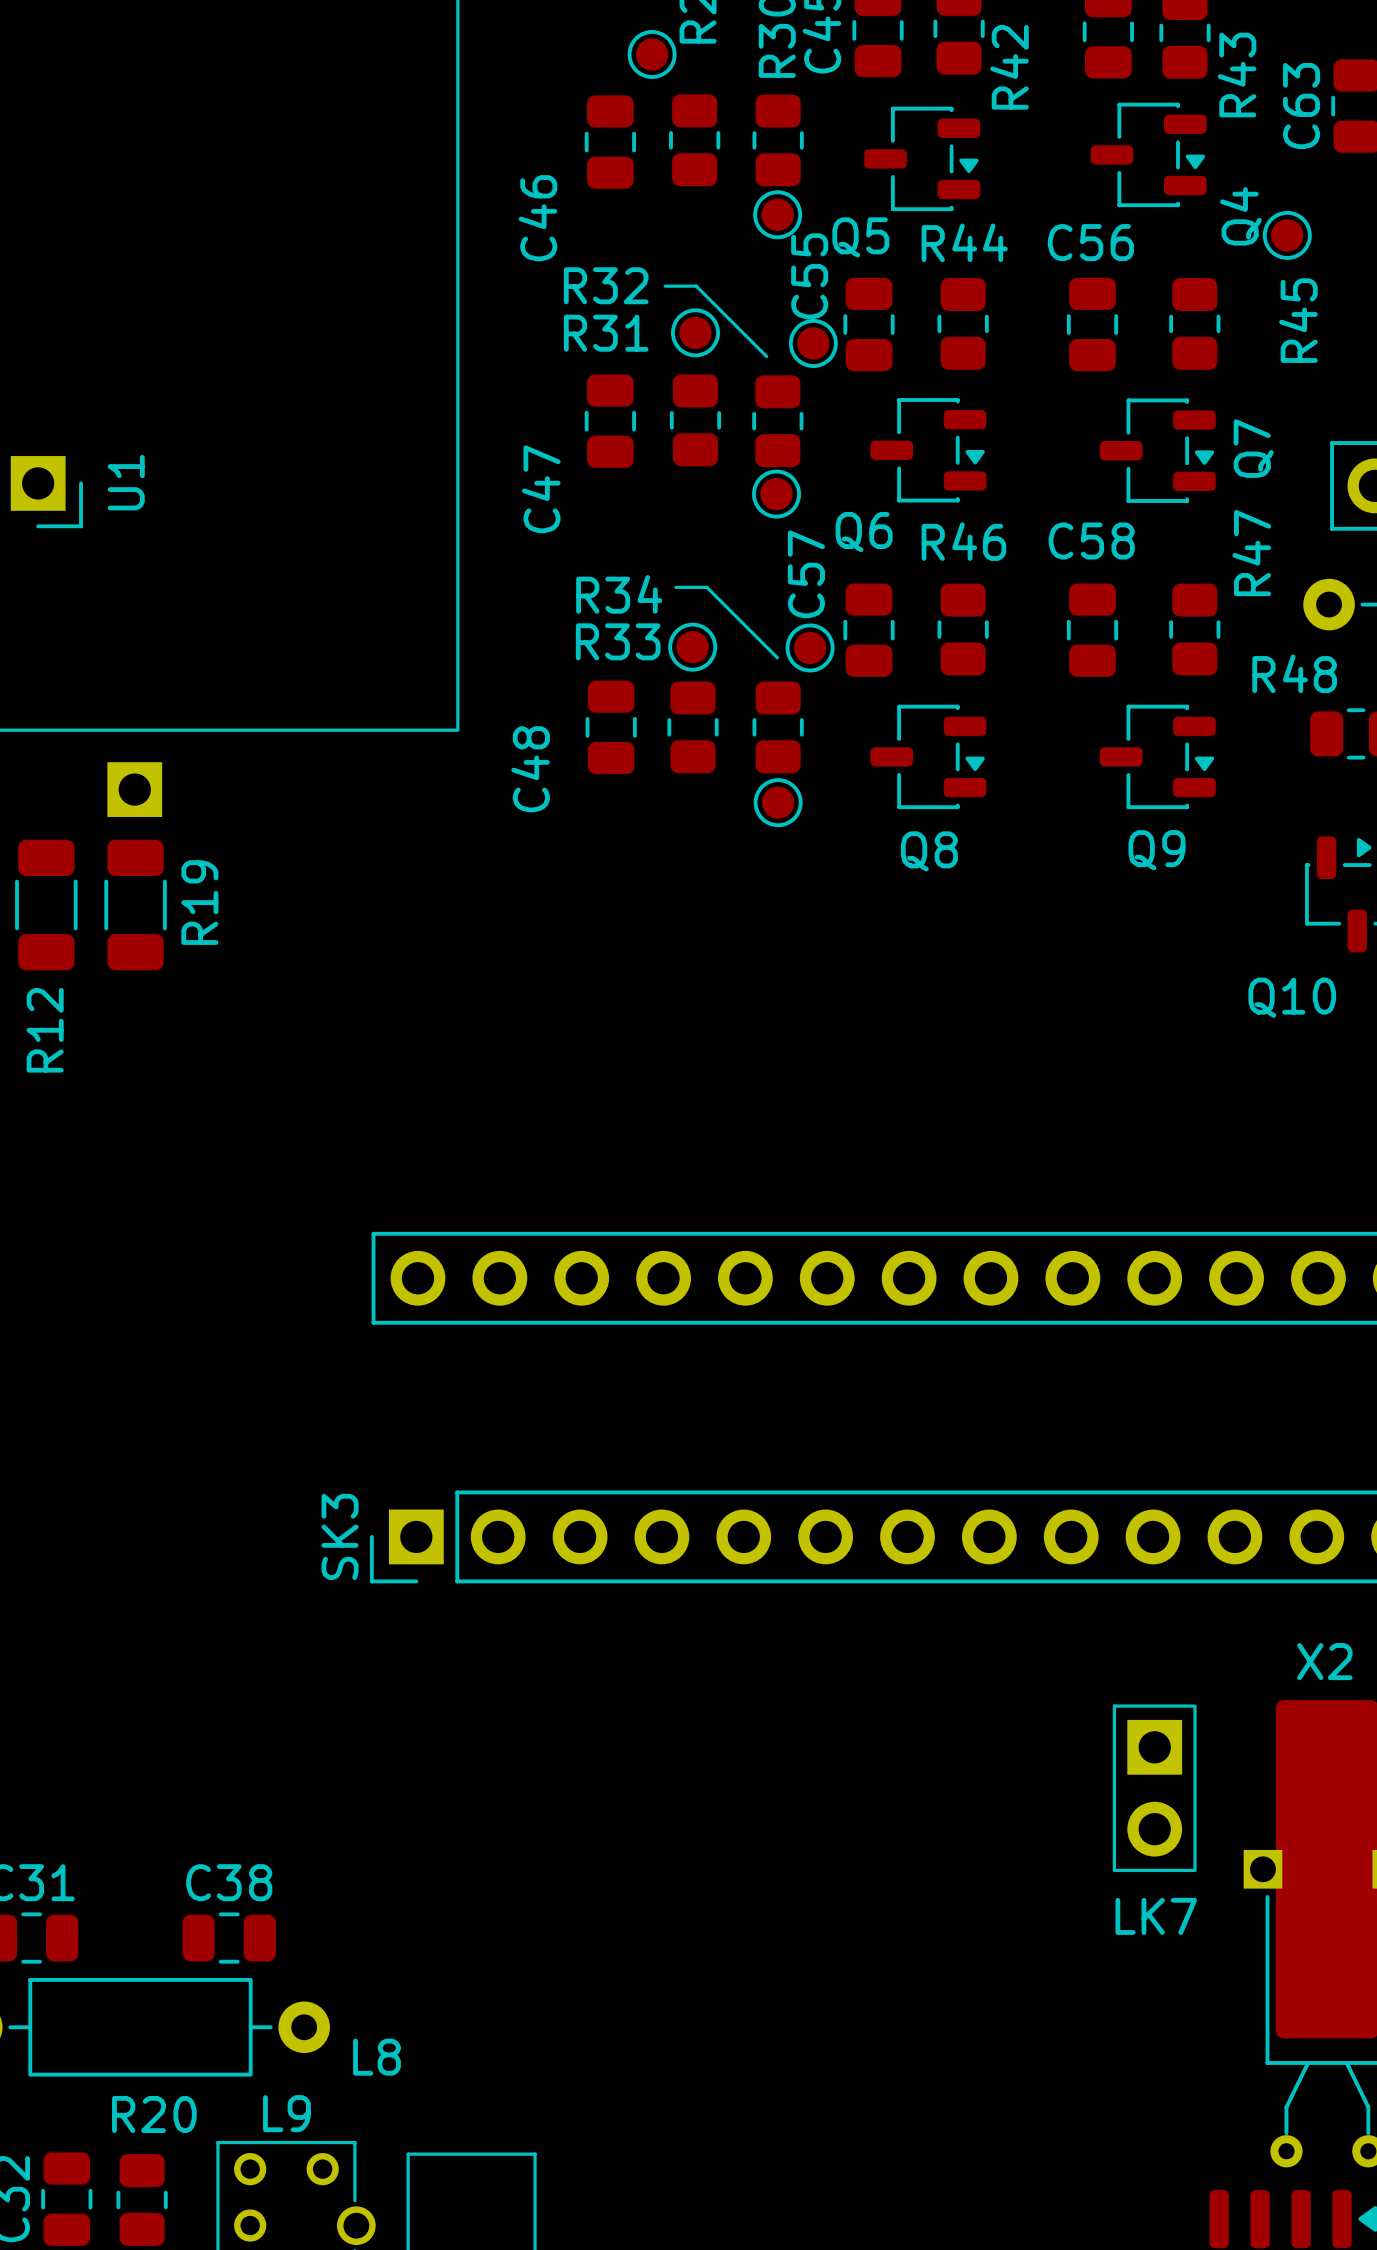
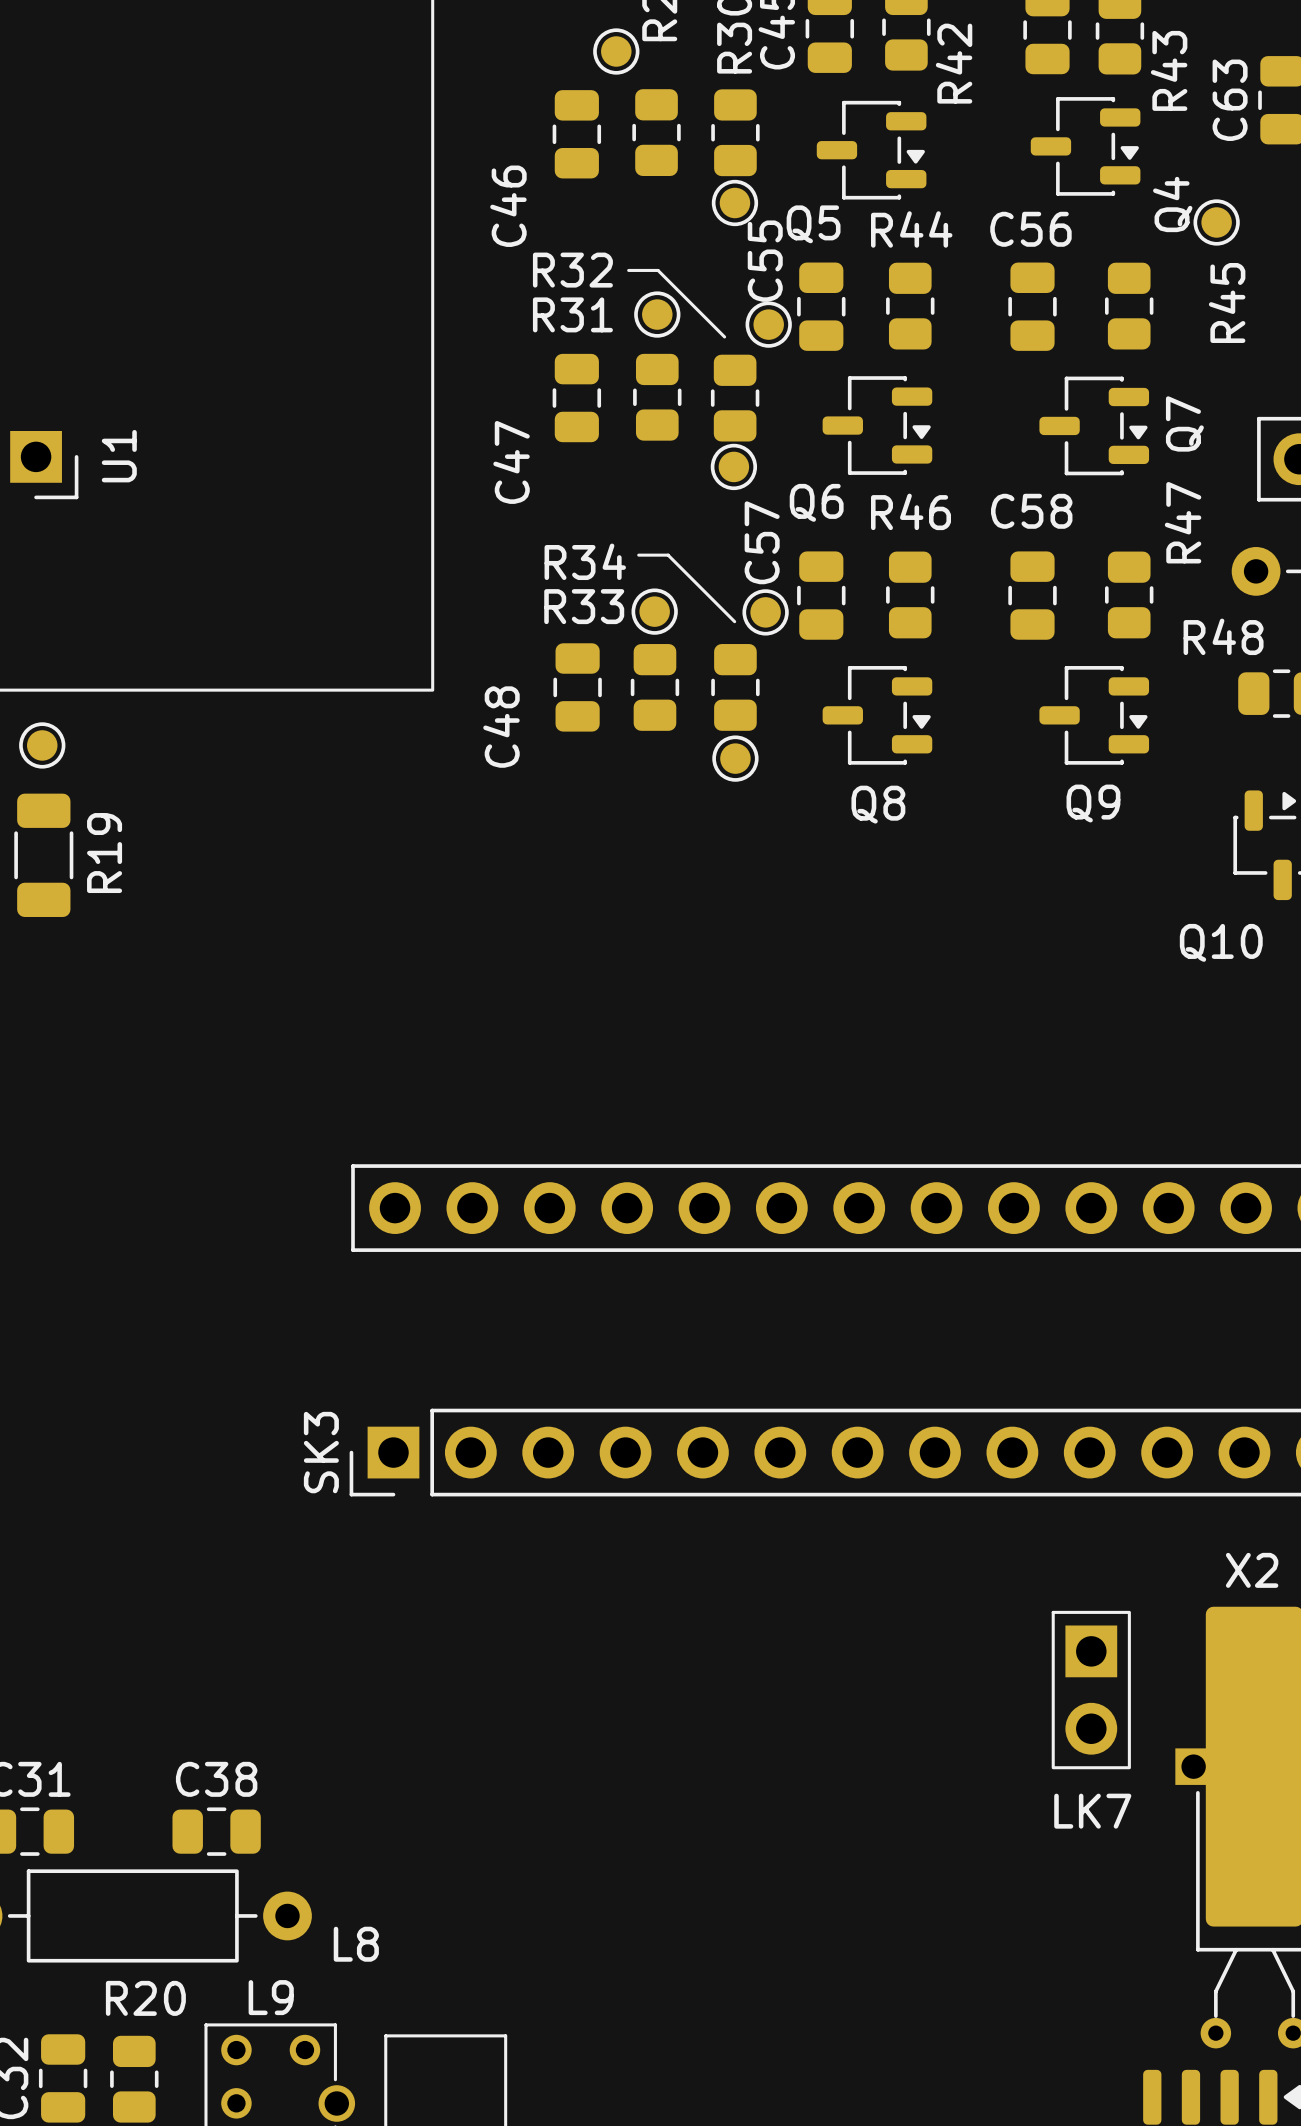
part: none -> (42, 745)
part: (134, 789) -> none
R19: (135, 905) -> none
R12 name: R12 (45, 1030) -> R19 (104, 853)

